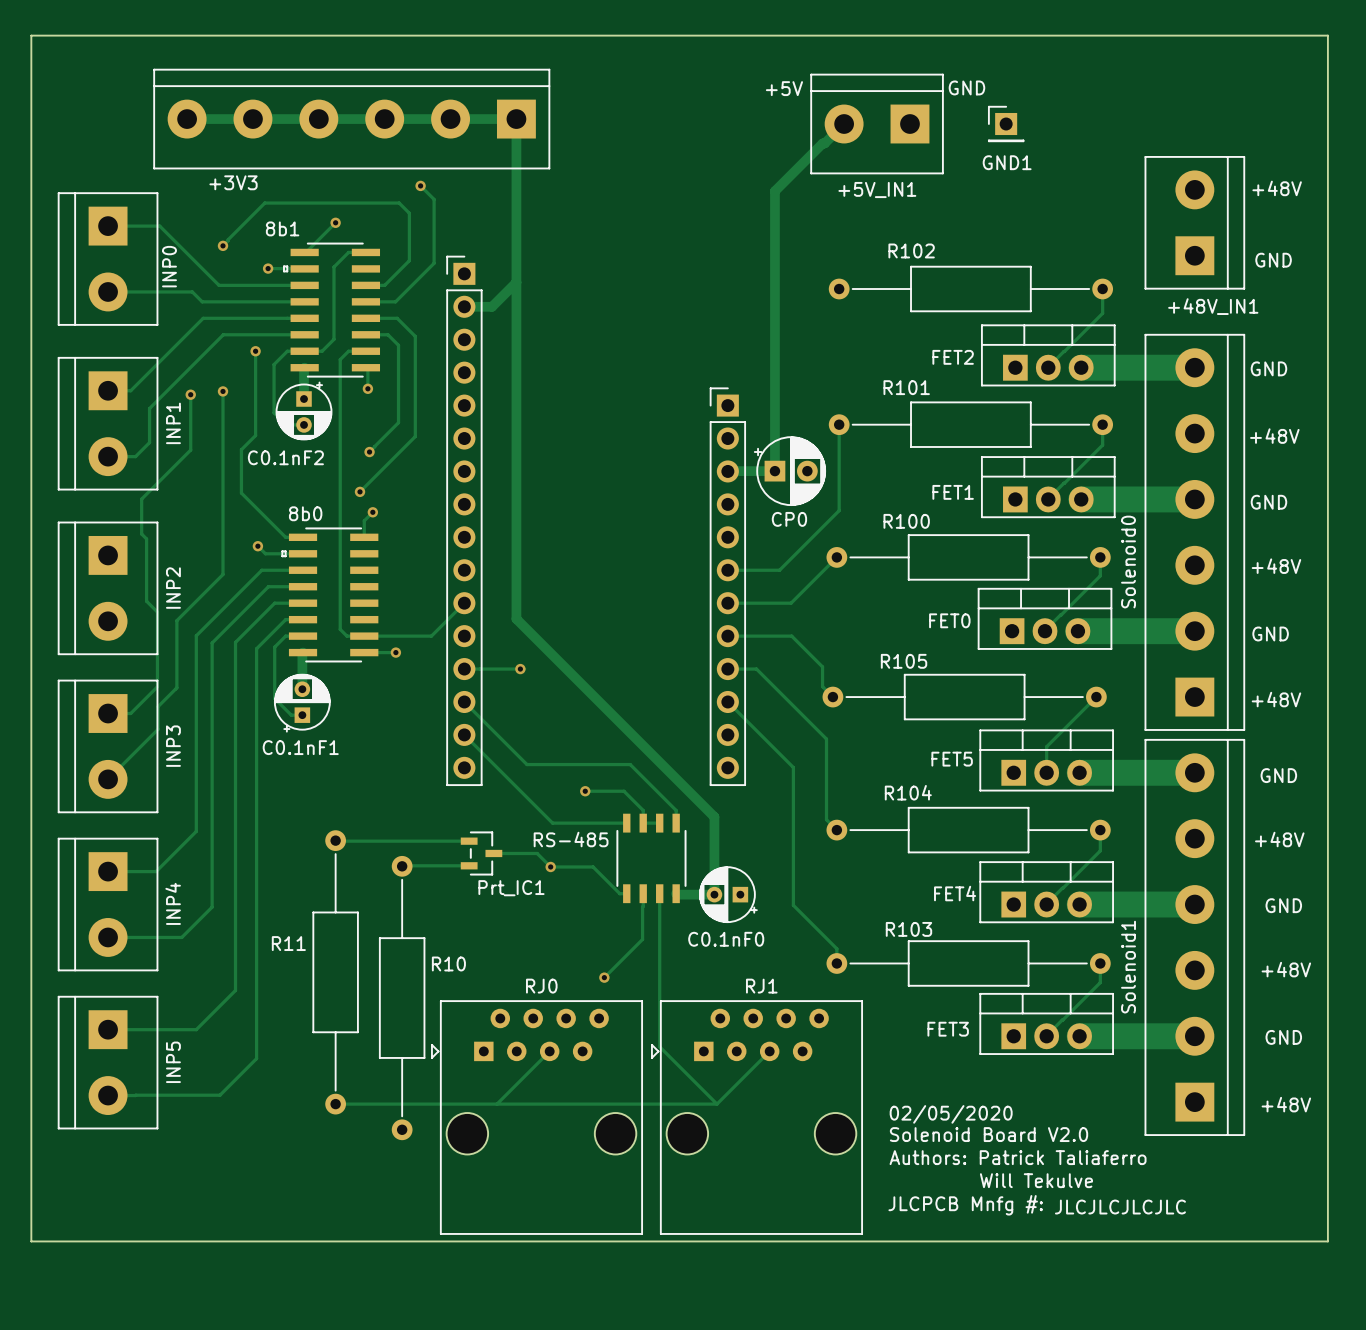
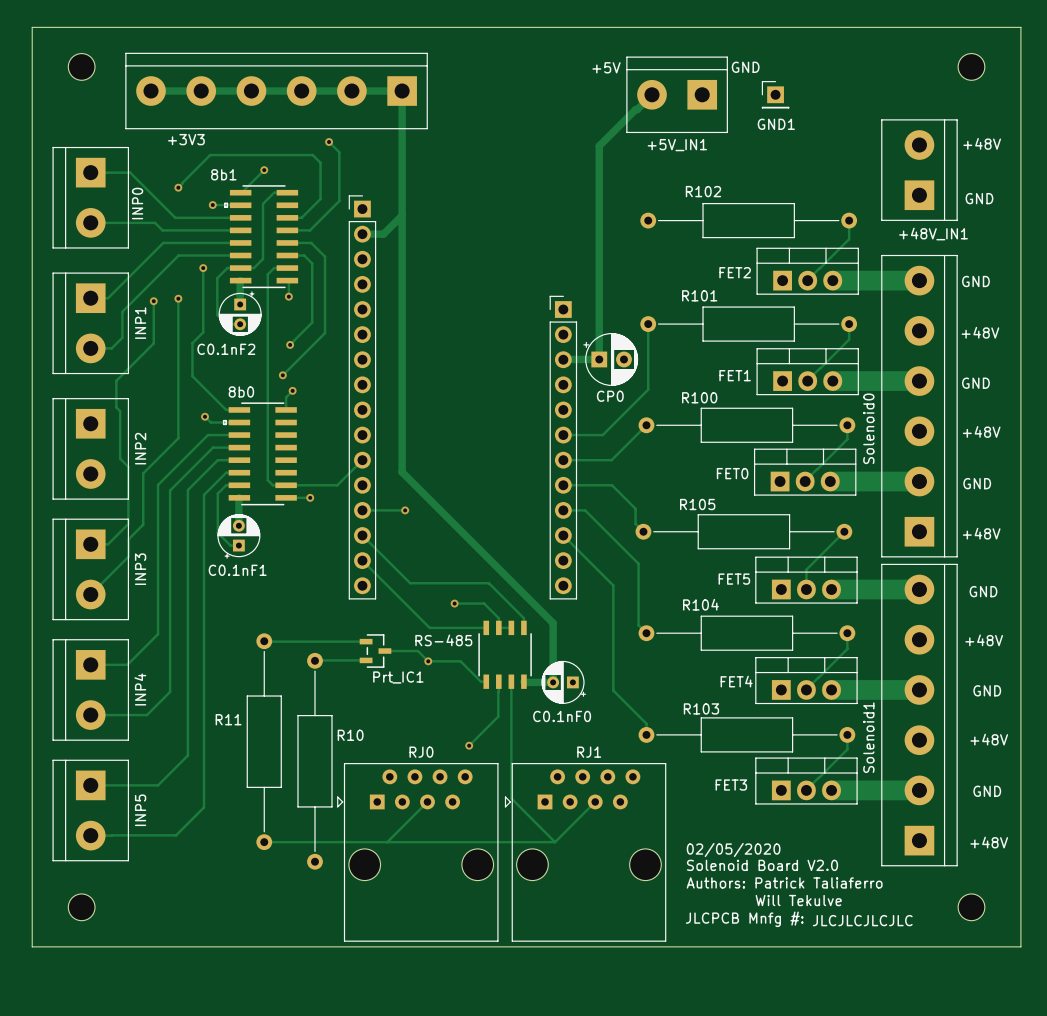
part: none -> (81, 66)
part: none -> (971, 66)
part: none -> (81, 907)
part: none -> (971, 907)

